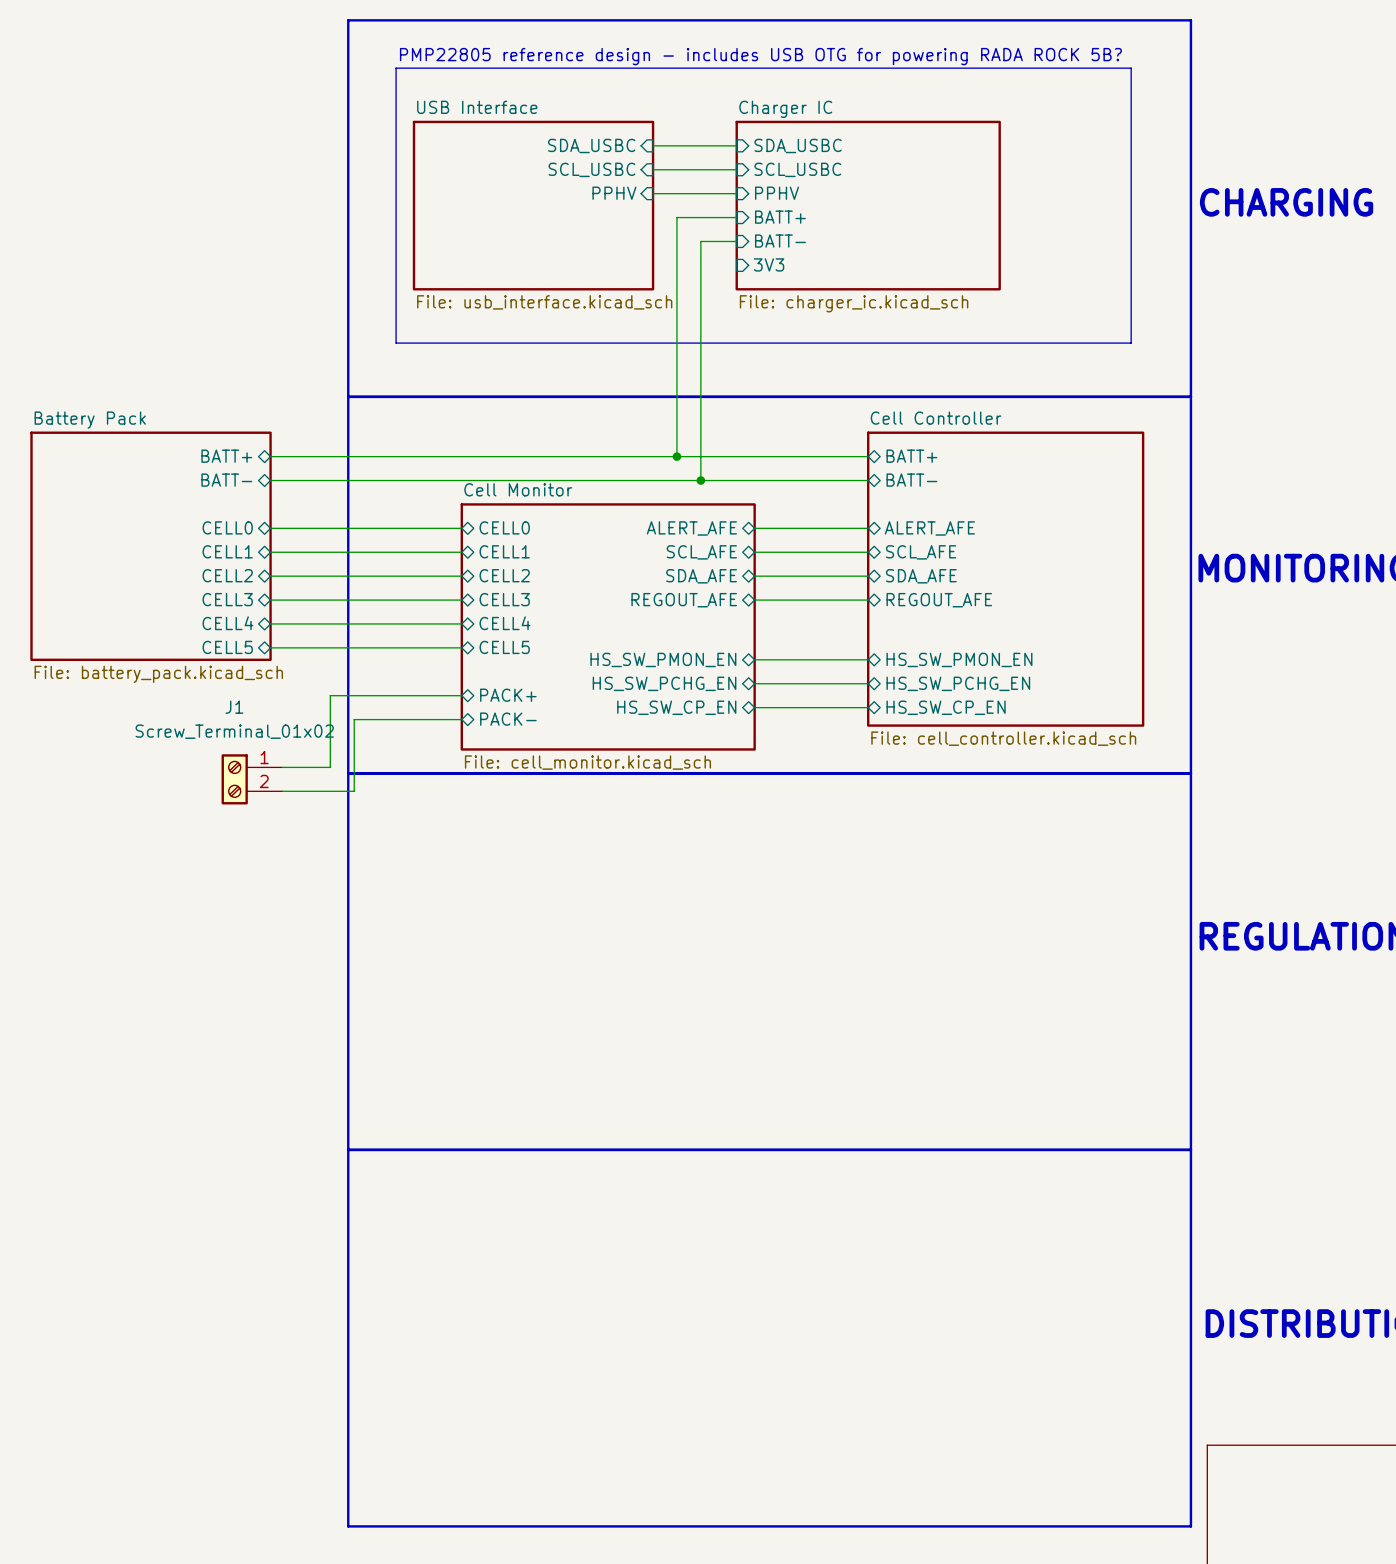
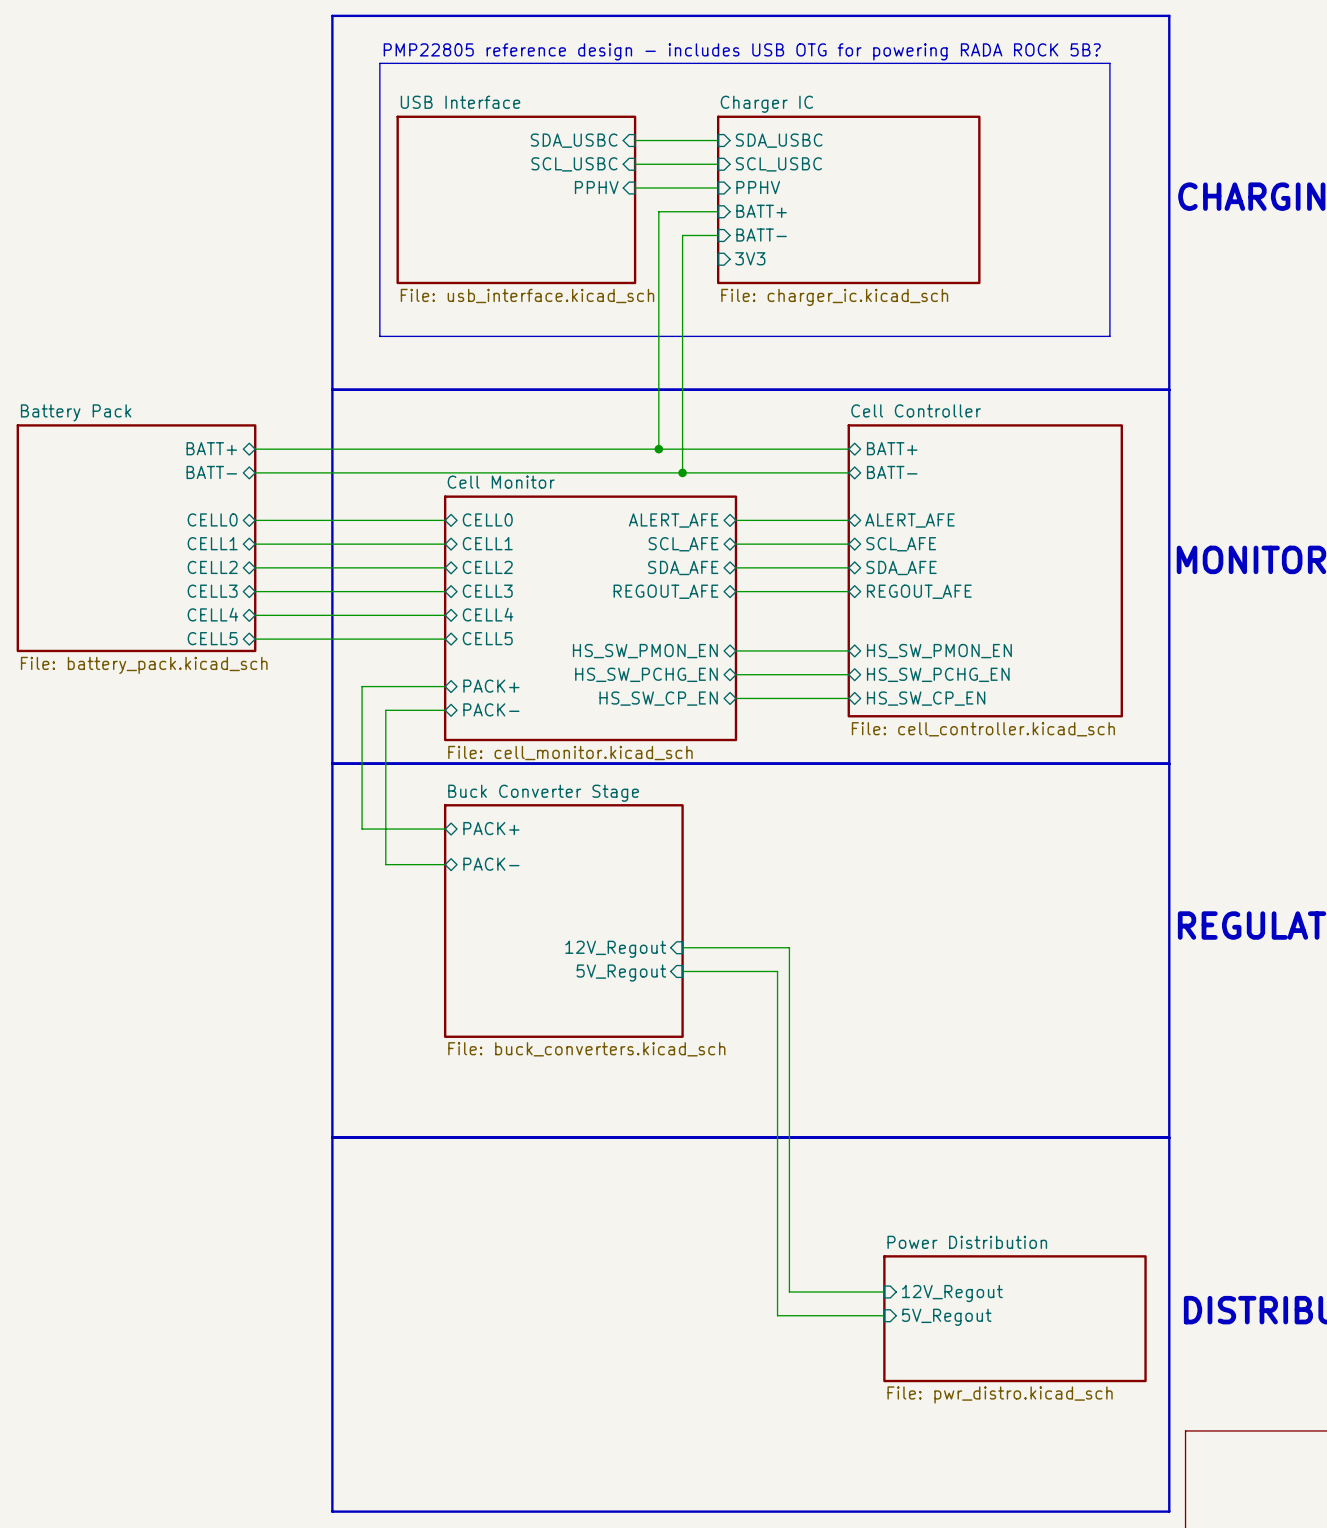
wire: (378, 695) (330, 695) (330, 767) (282, 767) -> (362, 686) (362, 829) (445, 829)
wire: (402, 719) (354, 719) (354, 791) (282, 791) -> (385, 710) (385, 864) (445, 864)
J1: Screw_Terminal_01x02 (252, 779) -> none
sheet pin: none -> PACK+ (491, 828)
sheet pin: none -> PACK- (491, 864)
sheet Buck Converter Stage: none -> File: buck_converters.kicad_sch (563, 921)
wire: none -> (682, 947) (789, 947) (789, 1291) (884, 1291)
sheet pin: none -> 12V_Regout (615, 949)
wire: none -> (682, 971) (777, 971) (777, 1315) (884, 1315)
sheet pin: none -> 5V_Regout (621, 973)
sheet pin: none -> 12V_Regout (952, 1293)
sheet pin: none -> 5V_Regout (946, 1317)
sheet Power Distribution: none -> File: pwr_distro.kicad_sch (1014, 1318)

